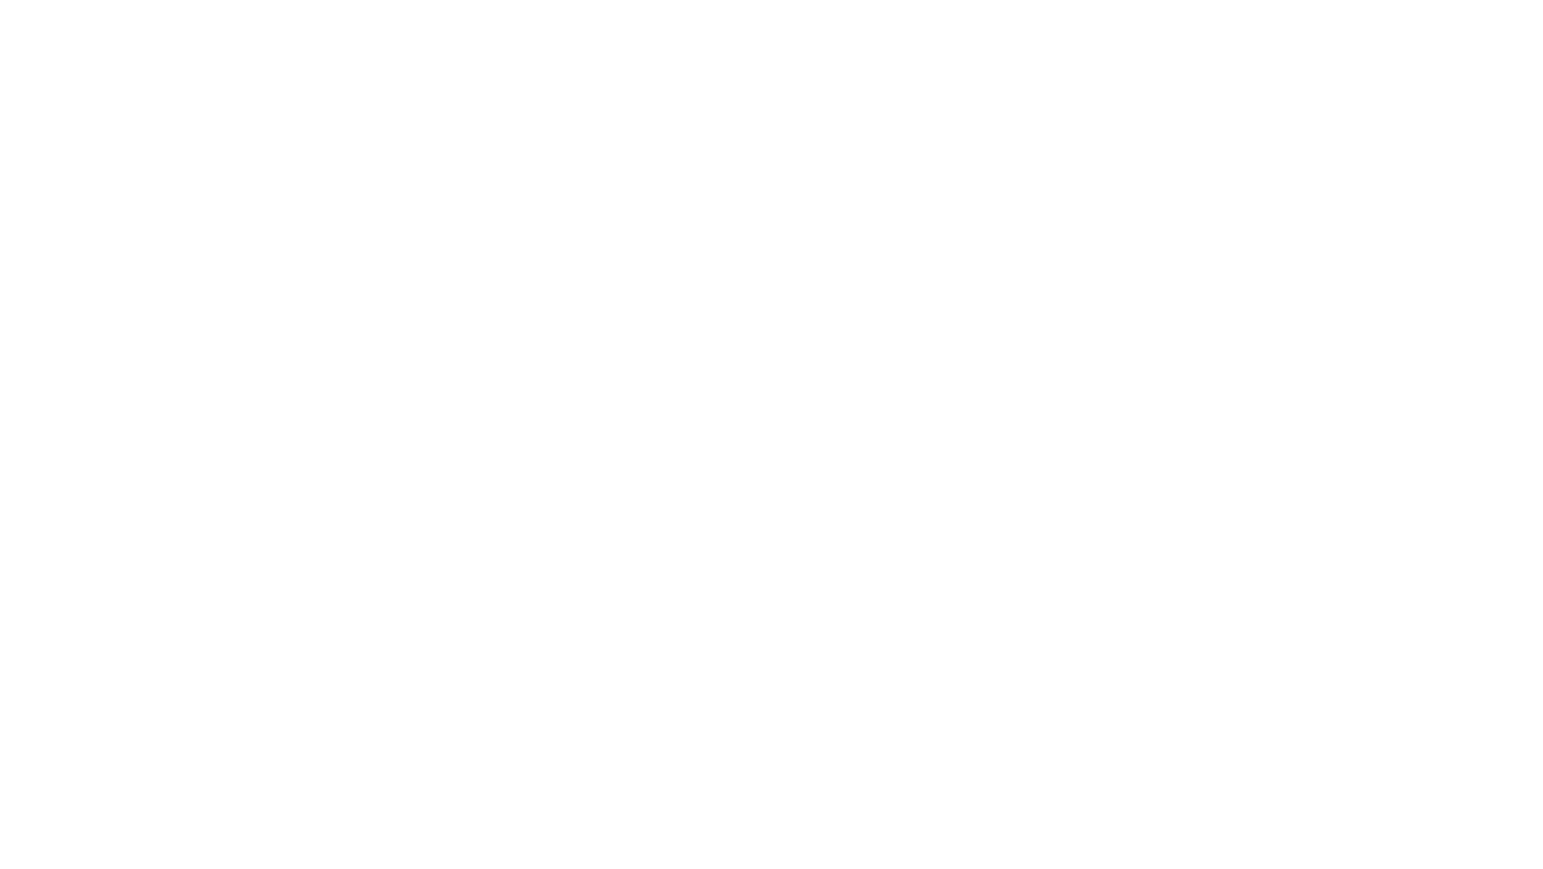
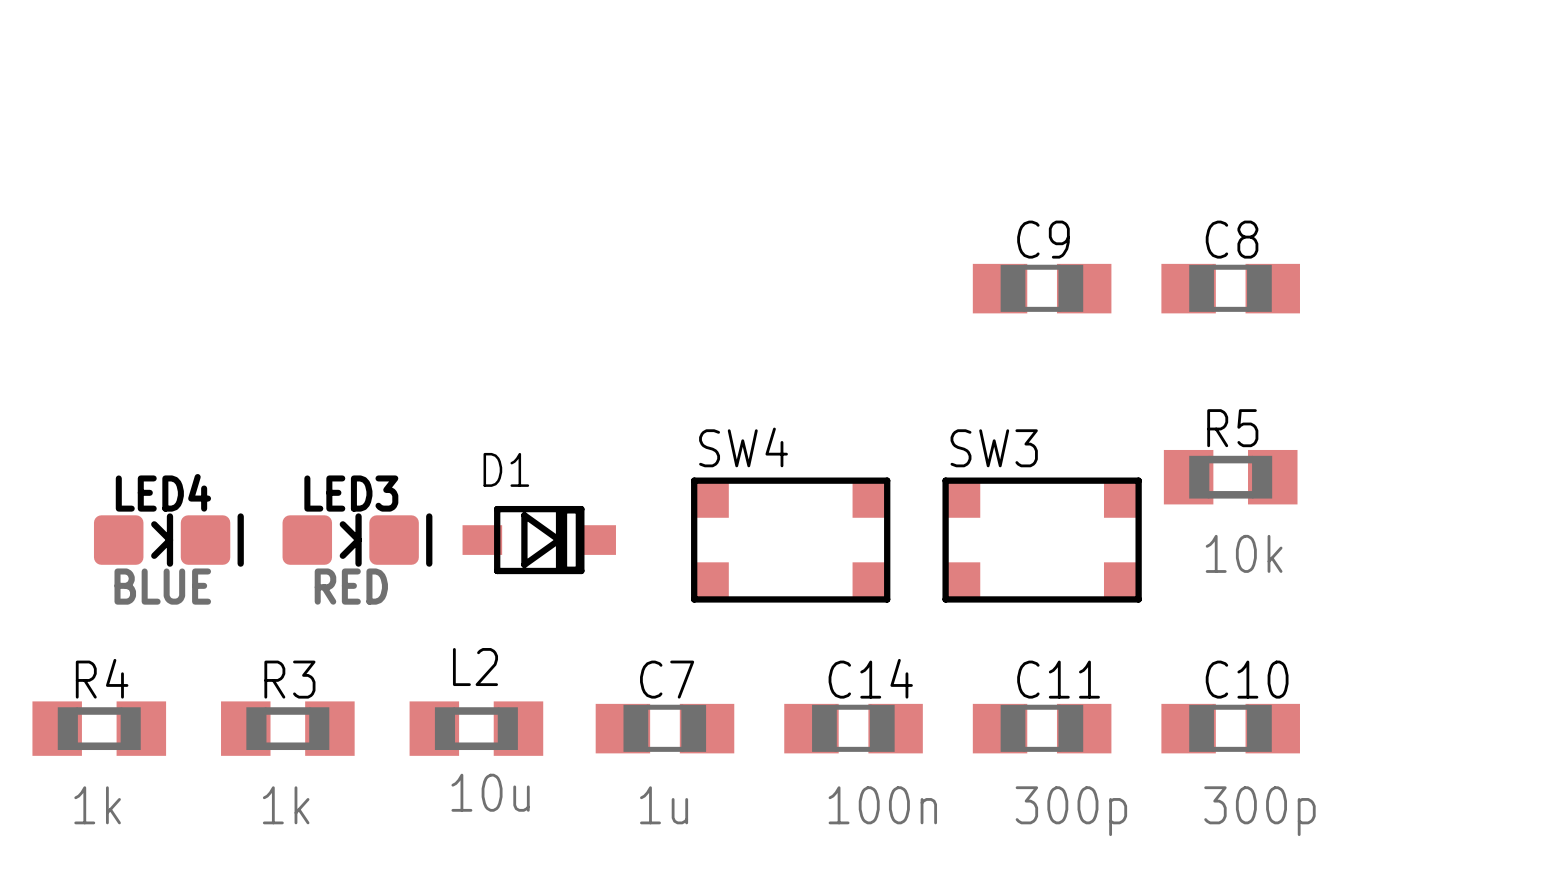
C9: none -> (1042, 288)
C8: none -> (1230, 288)
R5: none -> 10k (1230, 477)
LED4: none -> BLUE (168, 540)
LED3: none -> RED (357, 540)
D1: none -> (539, 540)
SW4: none -> (790, 540)
SW3: none -> (1042, 540)
R4: none -> 1k (99, 728)
R3: none -> 1k (287, 728)
L2: none -> 10u (476, 728)
C7: none -> 1u (664, 728)
C14: none -> 100n (853, 728)
C11: none -> 300p (1042, 728)
C10: none -> 300p (1230, 728)

